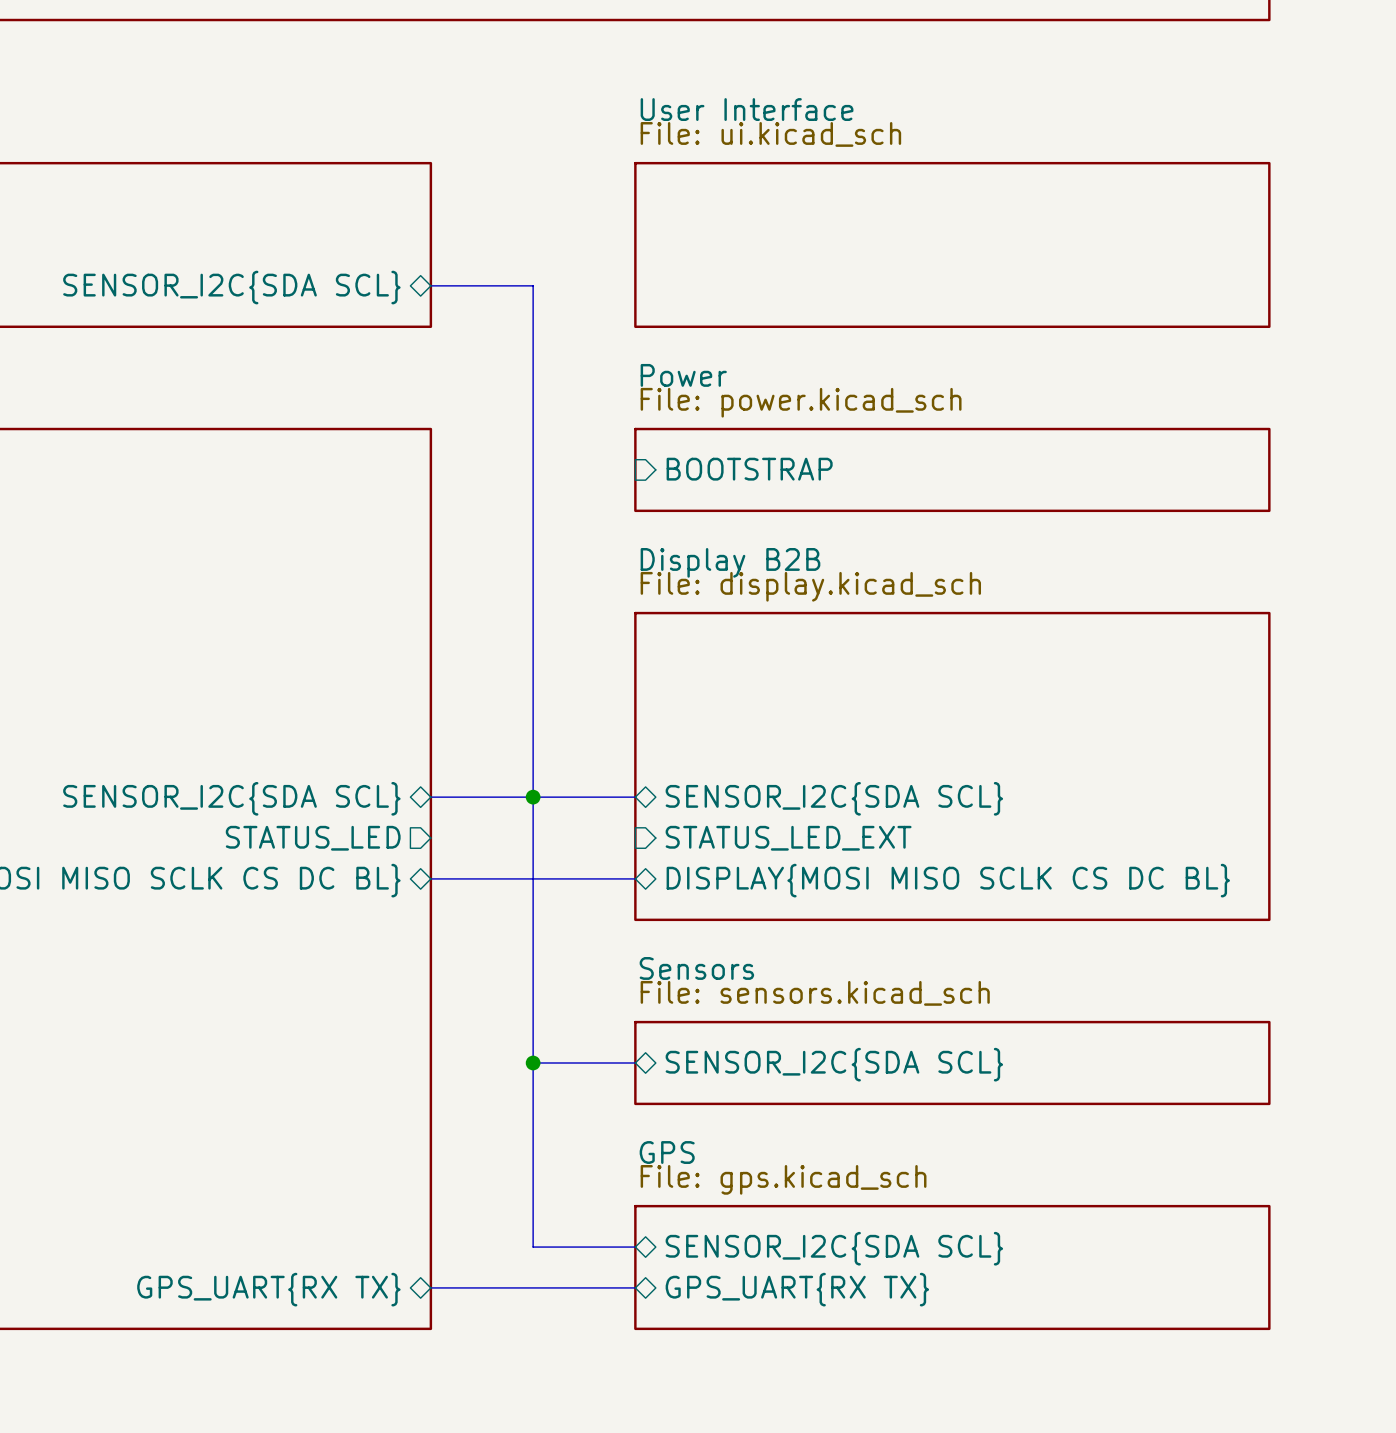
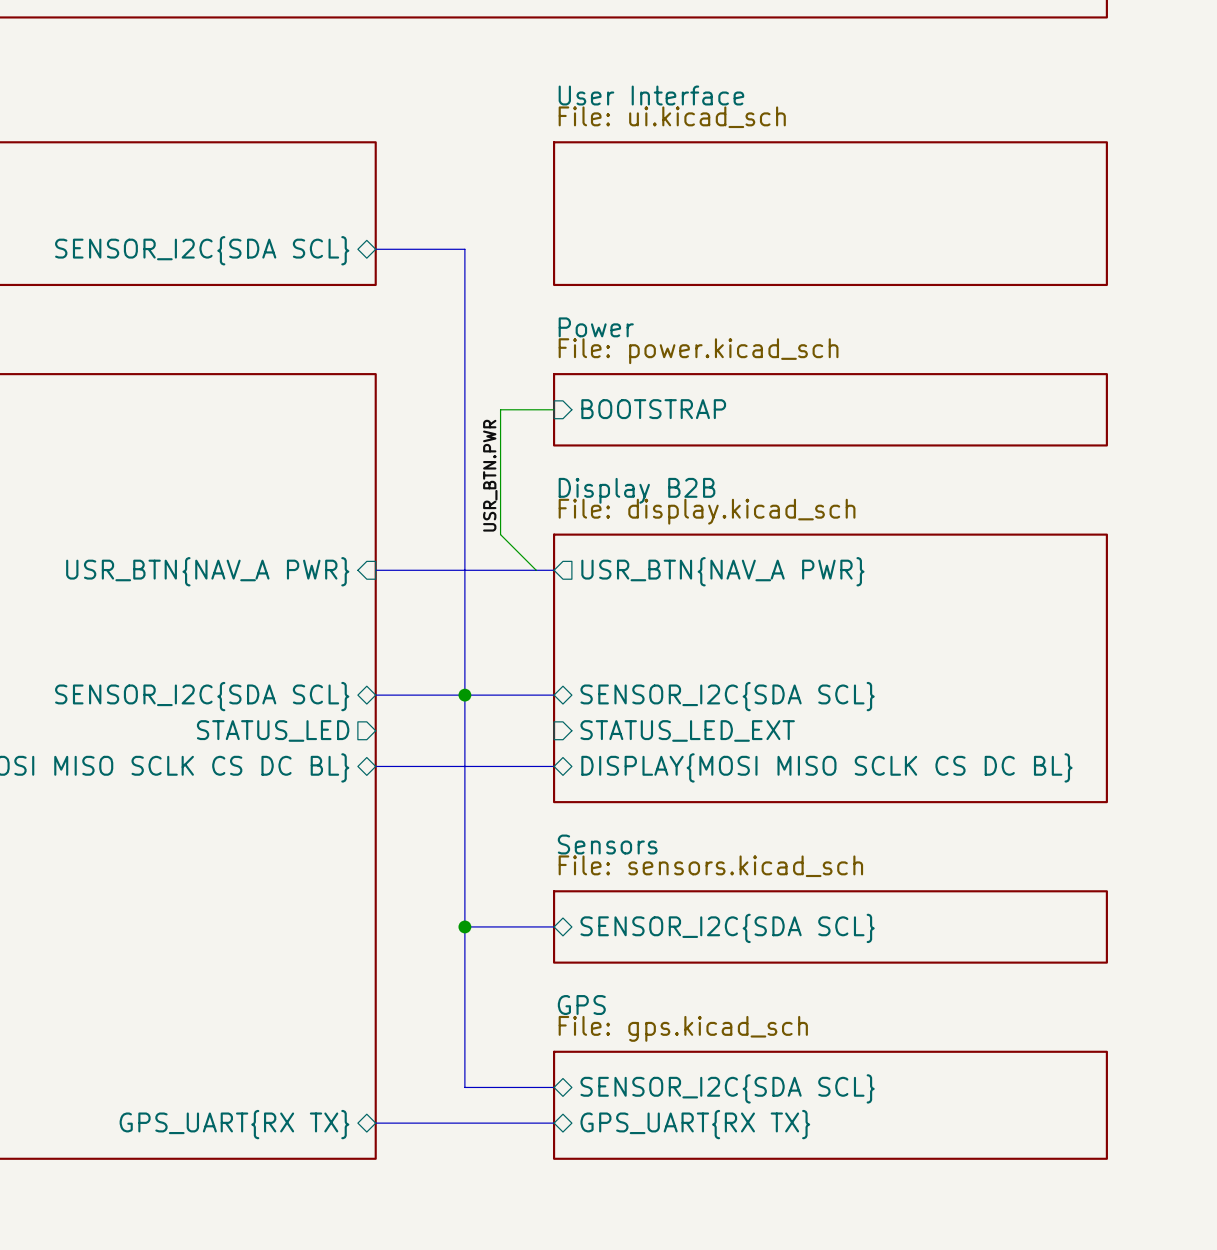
wire: none -> (554, 409) (500, 409) (500, 534) (536, 570)
label: none -> USR_BTN.PWR (490, 475)
bus: none -> (375, 570) (554, 570)
sheet pin: none -> USR_BTN{NAV_A PWR} (207, 571)
sheet pin: none -> USR_BTN{NAV_A PWR} (722, 571)

